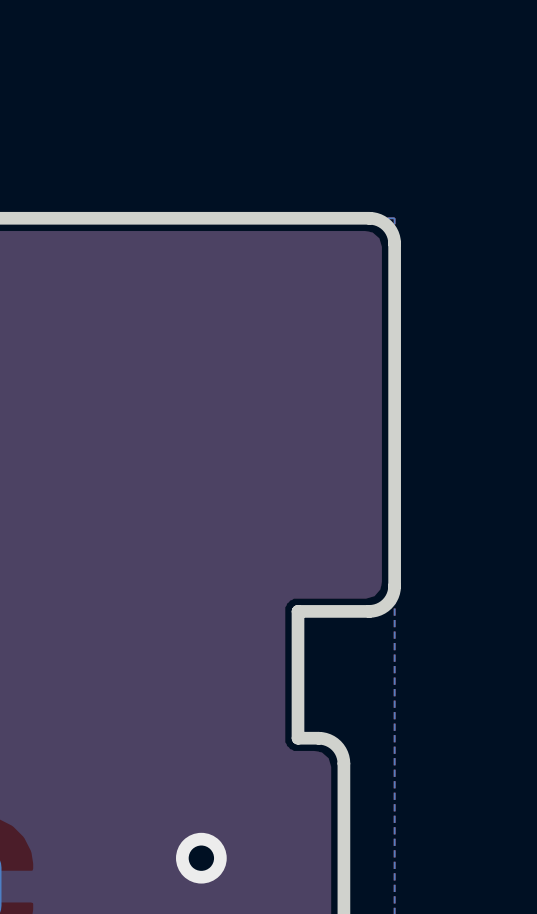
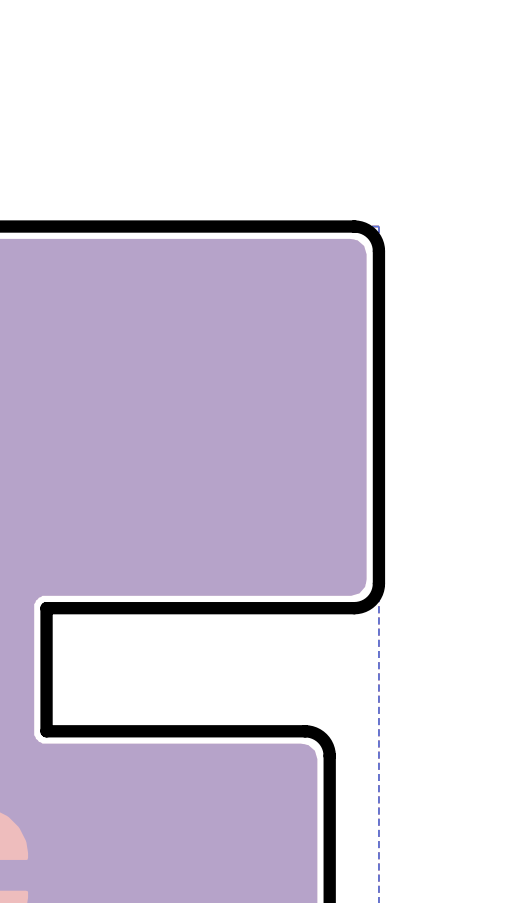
board edge: (298, 611) (298, 738) -> (285, 608) (46, 608) (46, 731) (285, 731)
via: (201, 858) -> none

